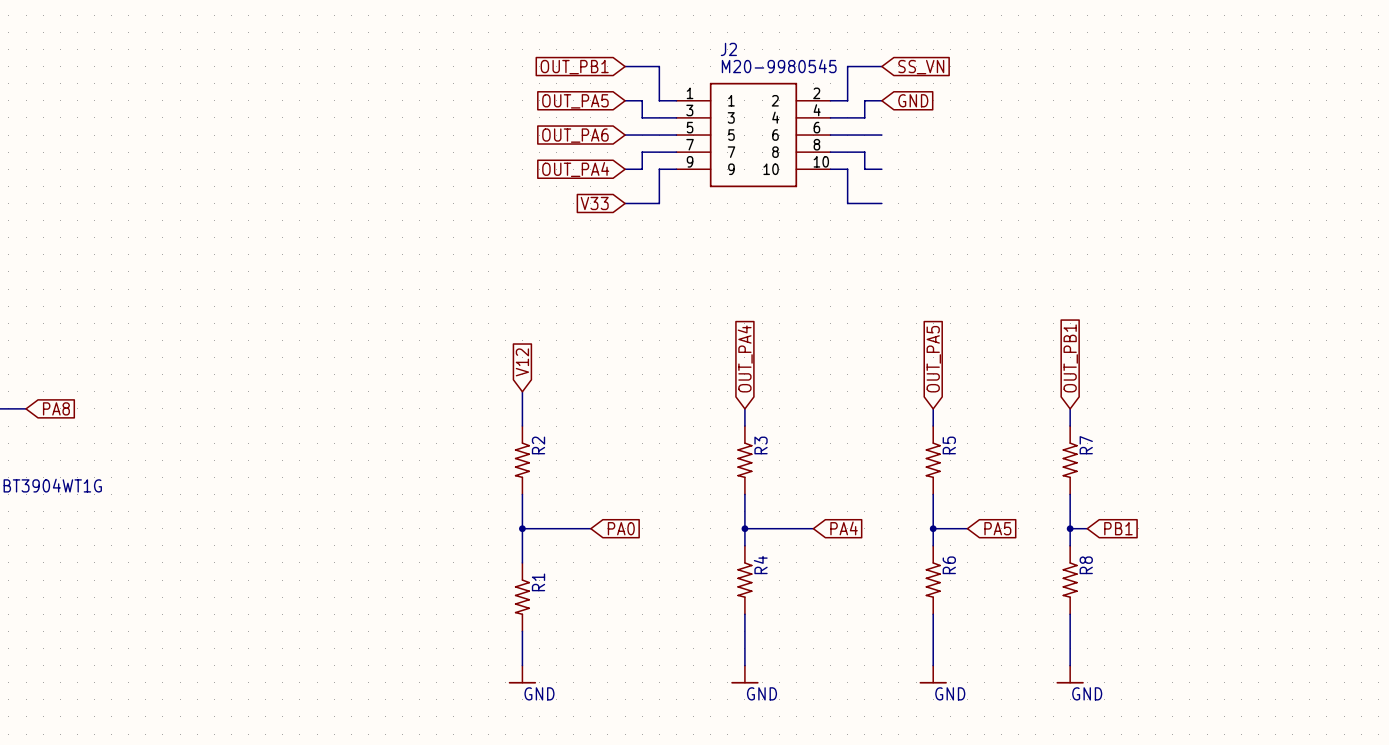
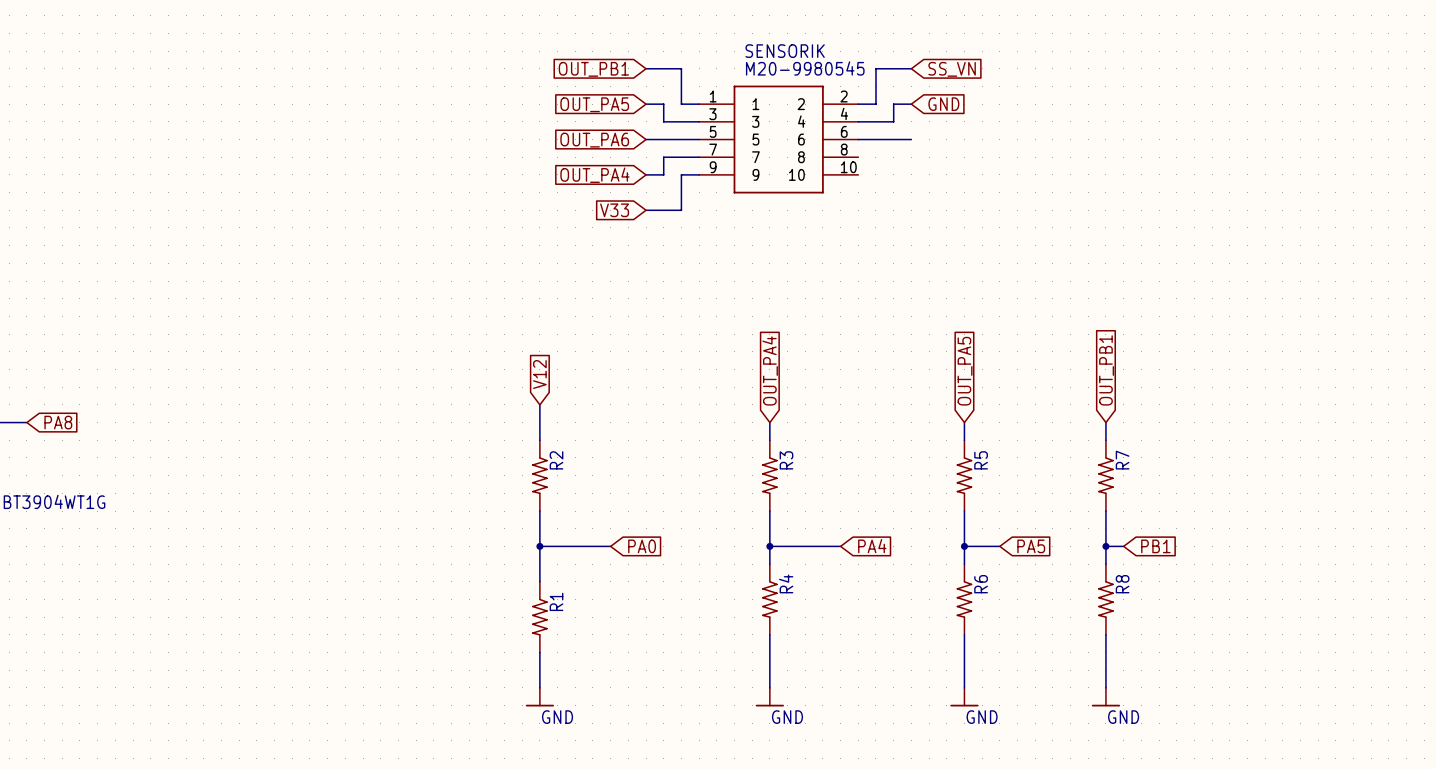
J2 name: J2 (728, 49) -> SENSORIK (785, 51)
wire: (830, 152) (864, 152) (864, 169) (881, 169) -> none
wire: (830, 169) (847, 169) (847, 203) (881, 203) -> none

